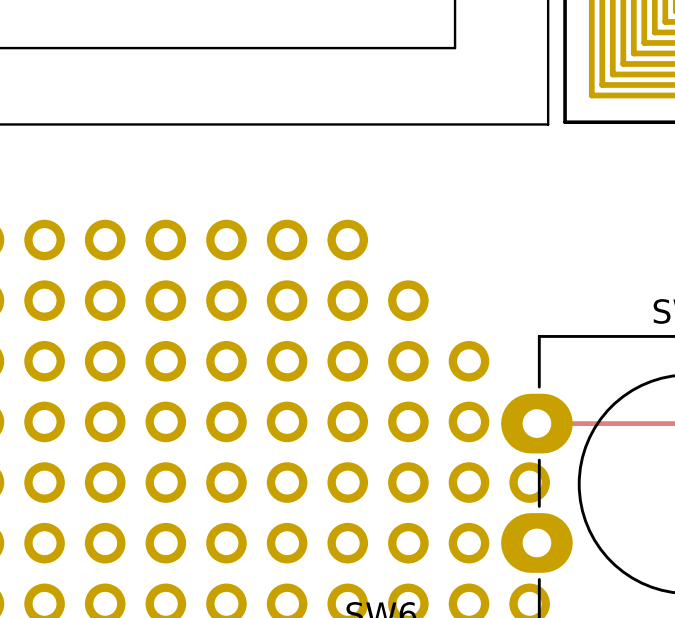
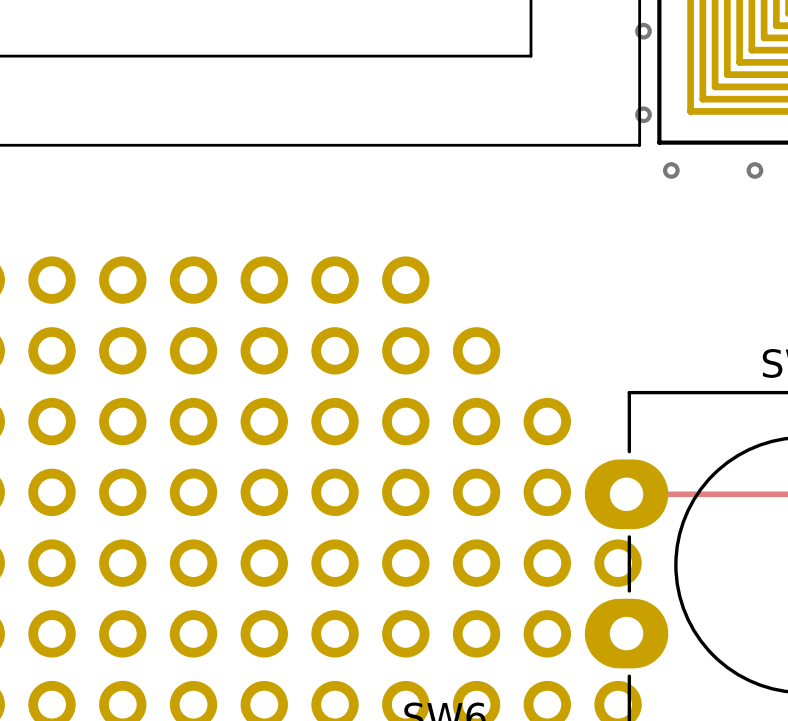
via: none -> (643, 31)
via: none -> (643, 114)
via: none -> (671, 170)
via: none -> (754, 170)

